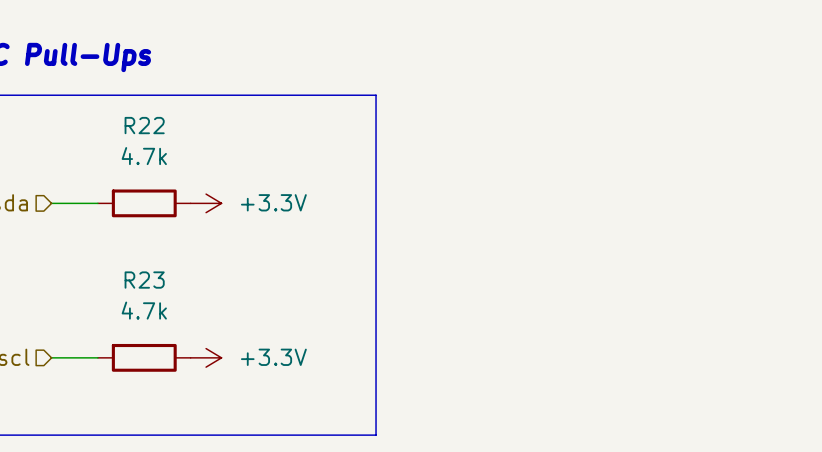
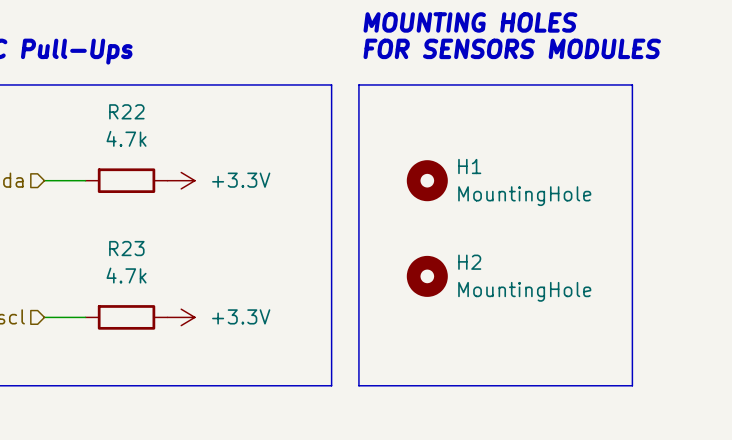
text: none -> MOUNTING HOLES (470, 22)
text: none -> FOR SENSORS MODULES (512, 48)
line: none -> (358, 84) (632, 84) (632, 385) (358, 385) (358, 84)
H1: none -> MountingHole (427, 180)
H2: none -> MountingHole (427, 276)

